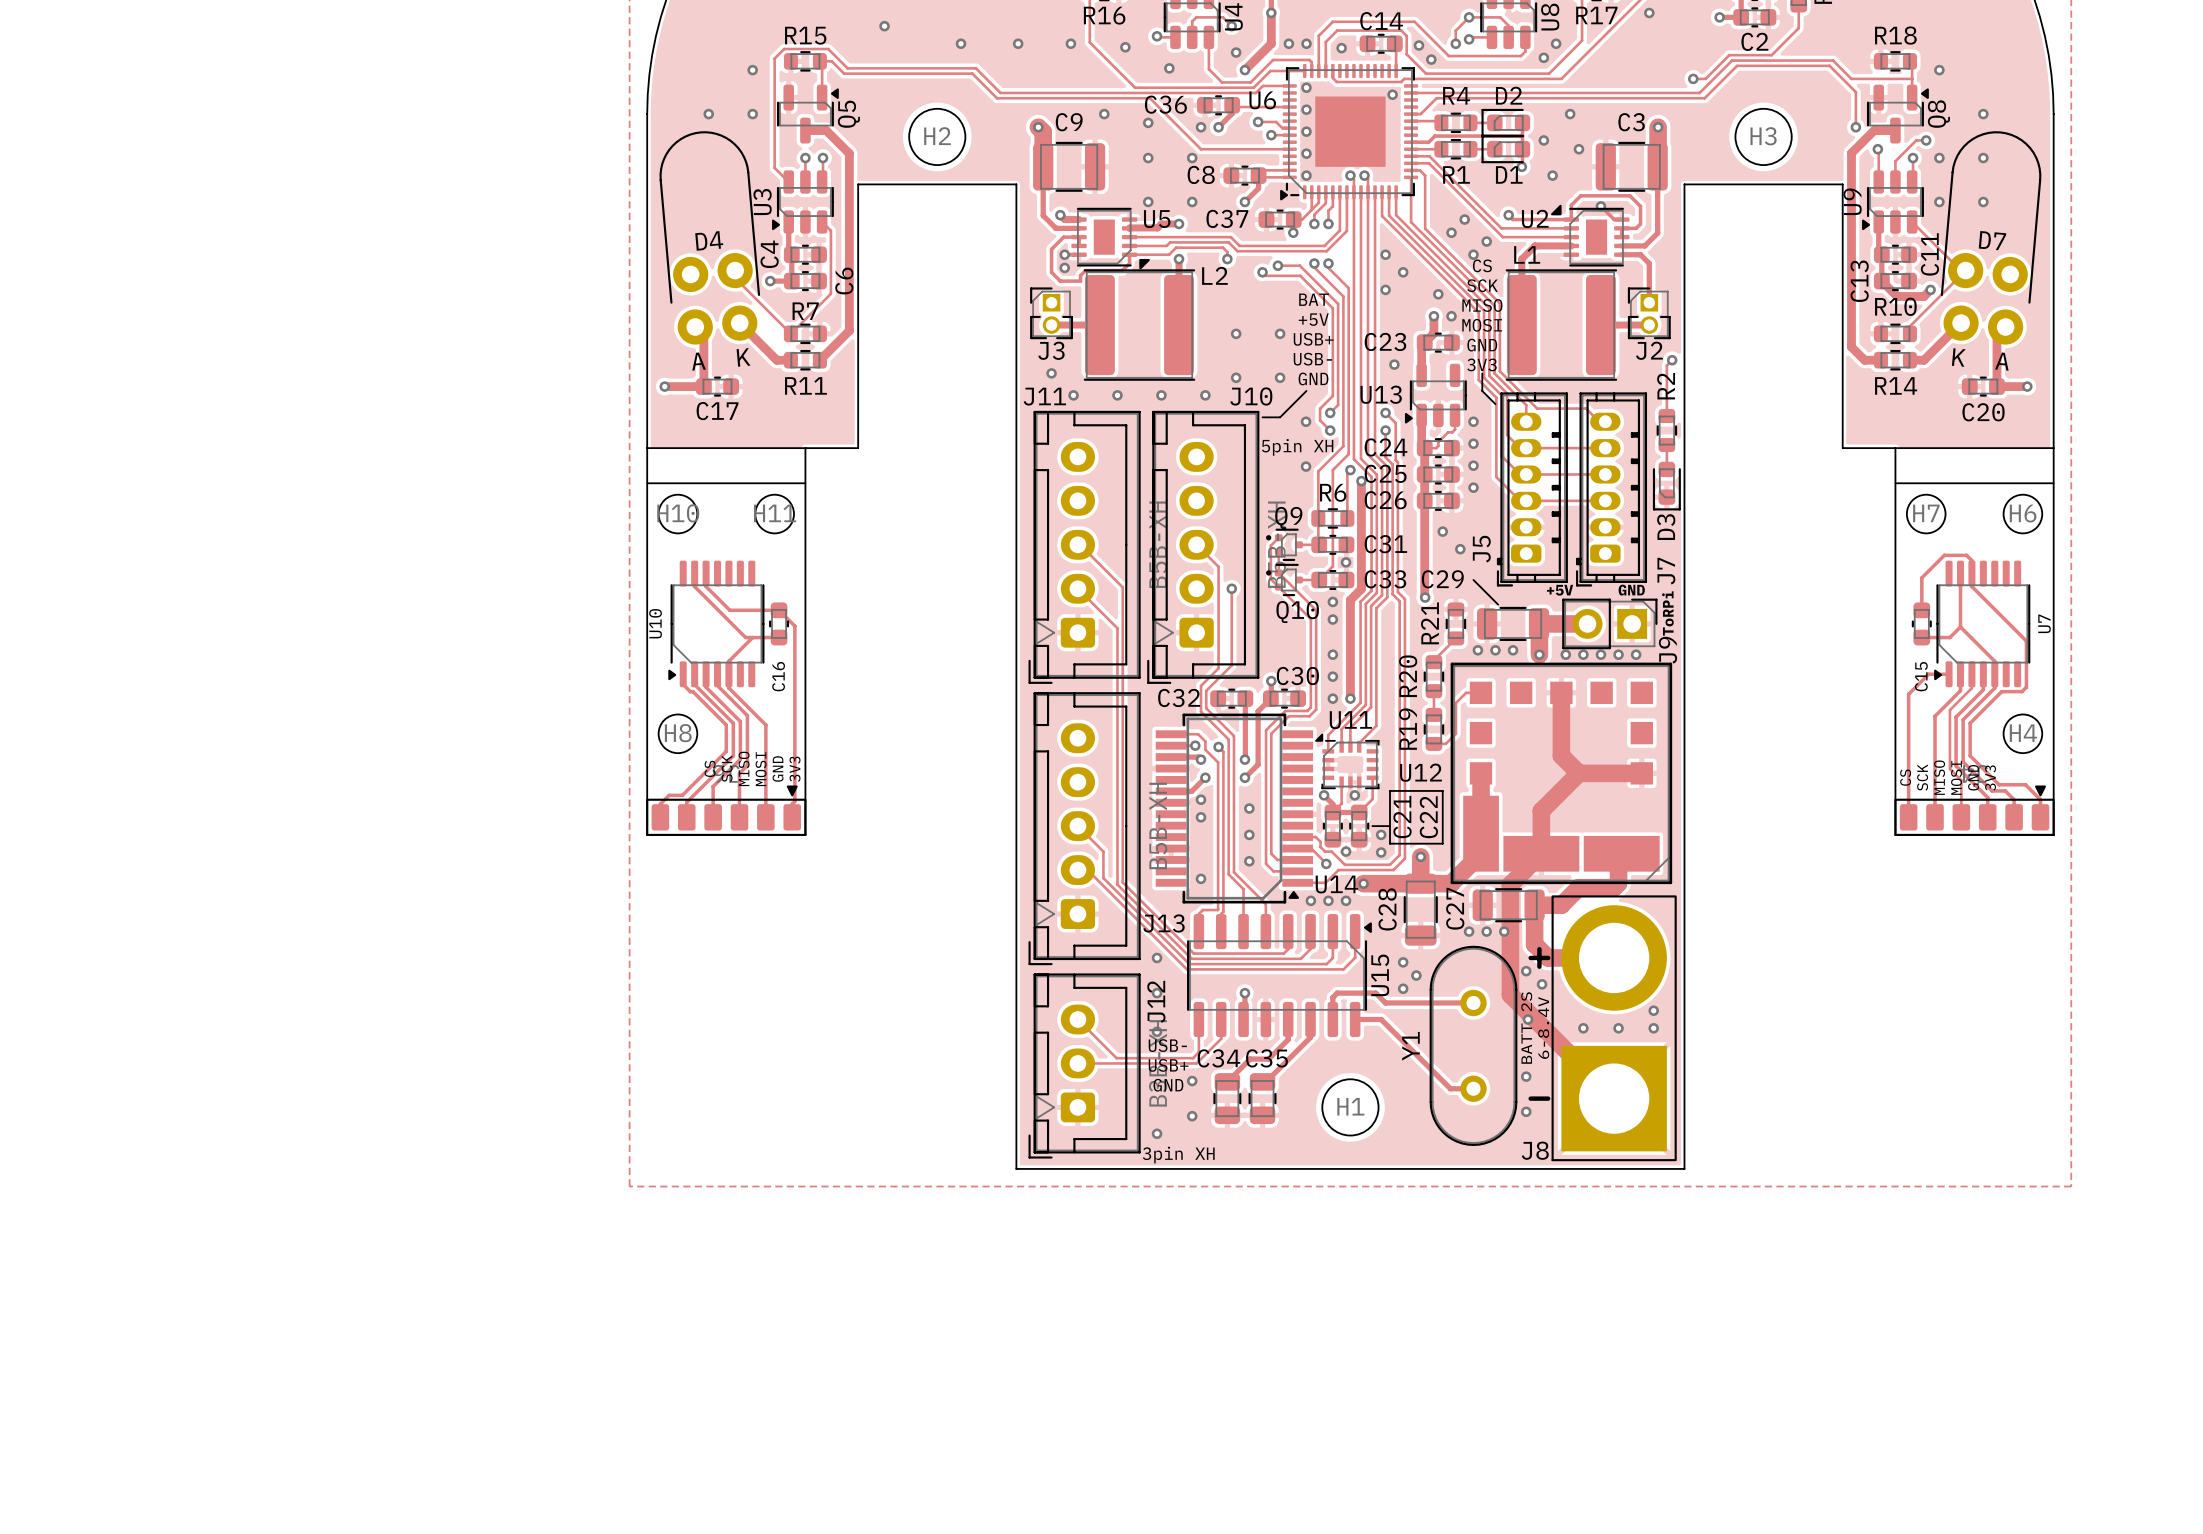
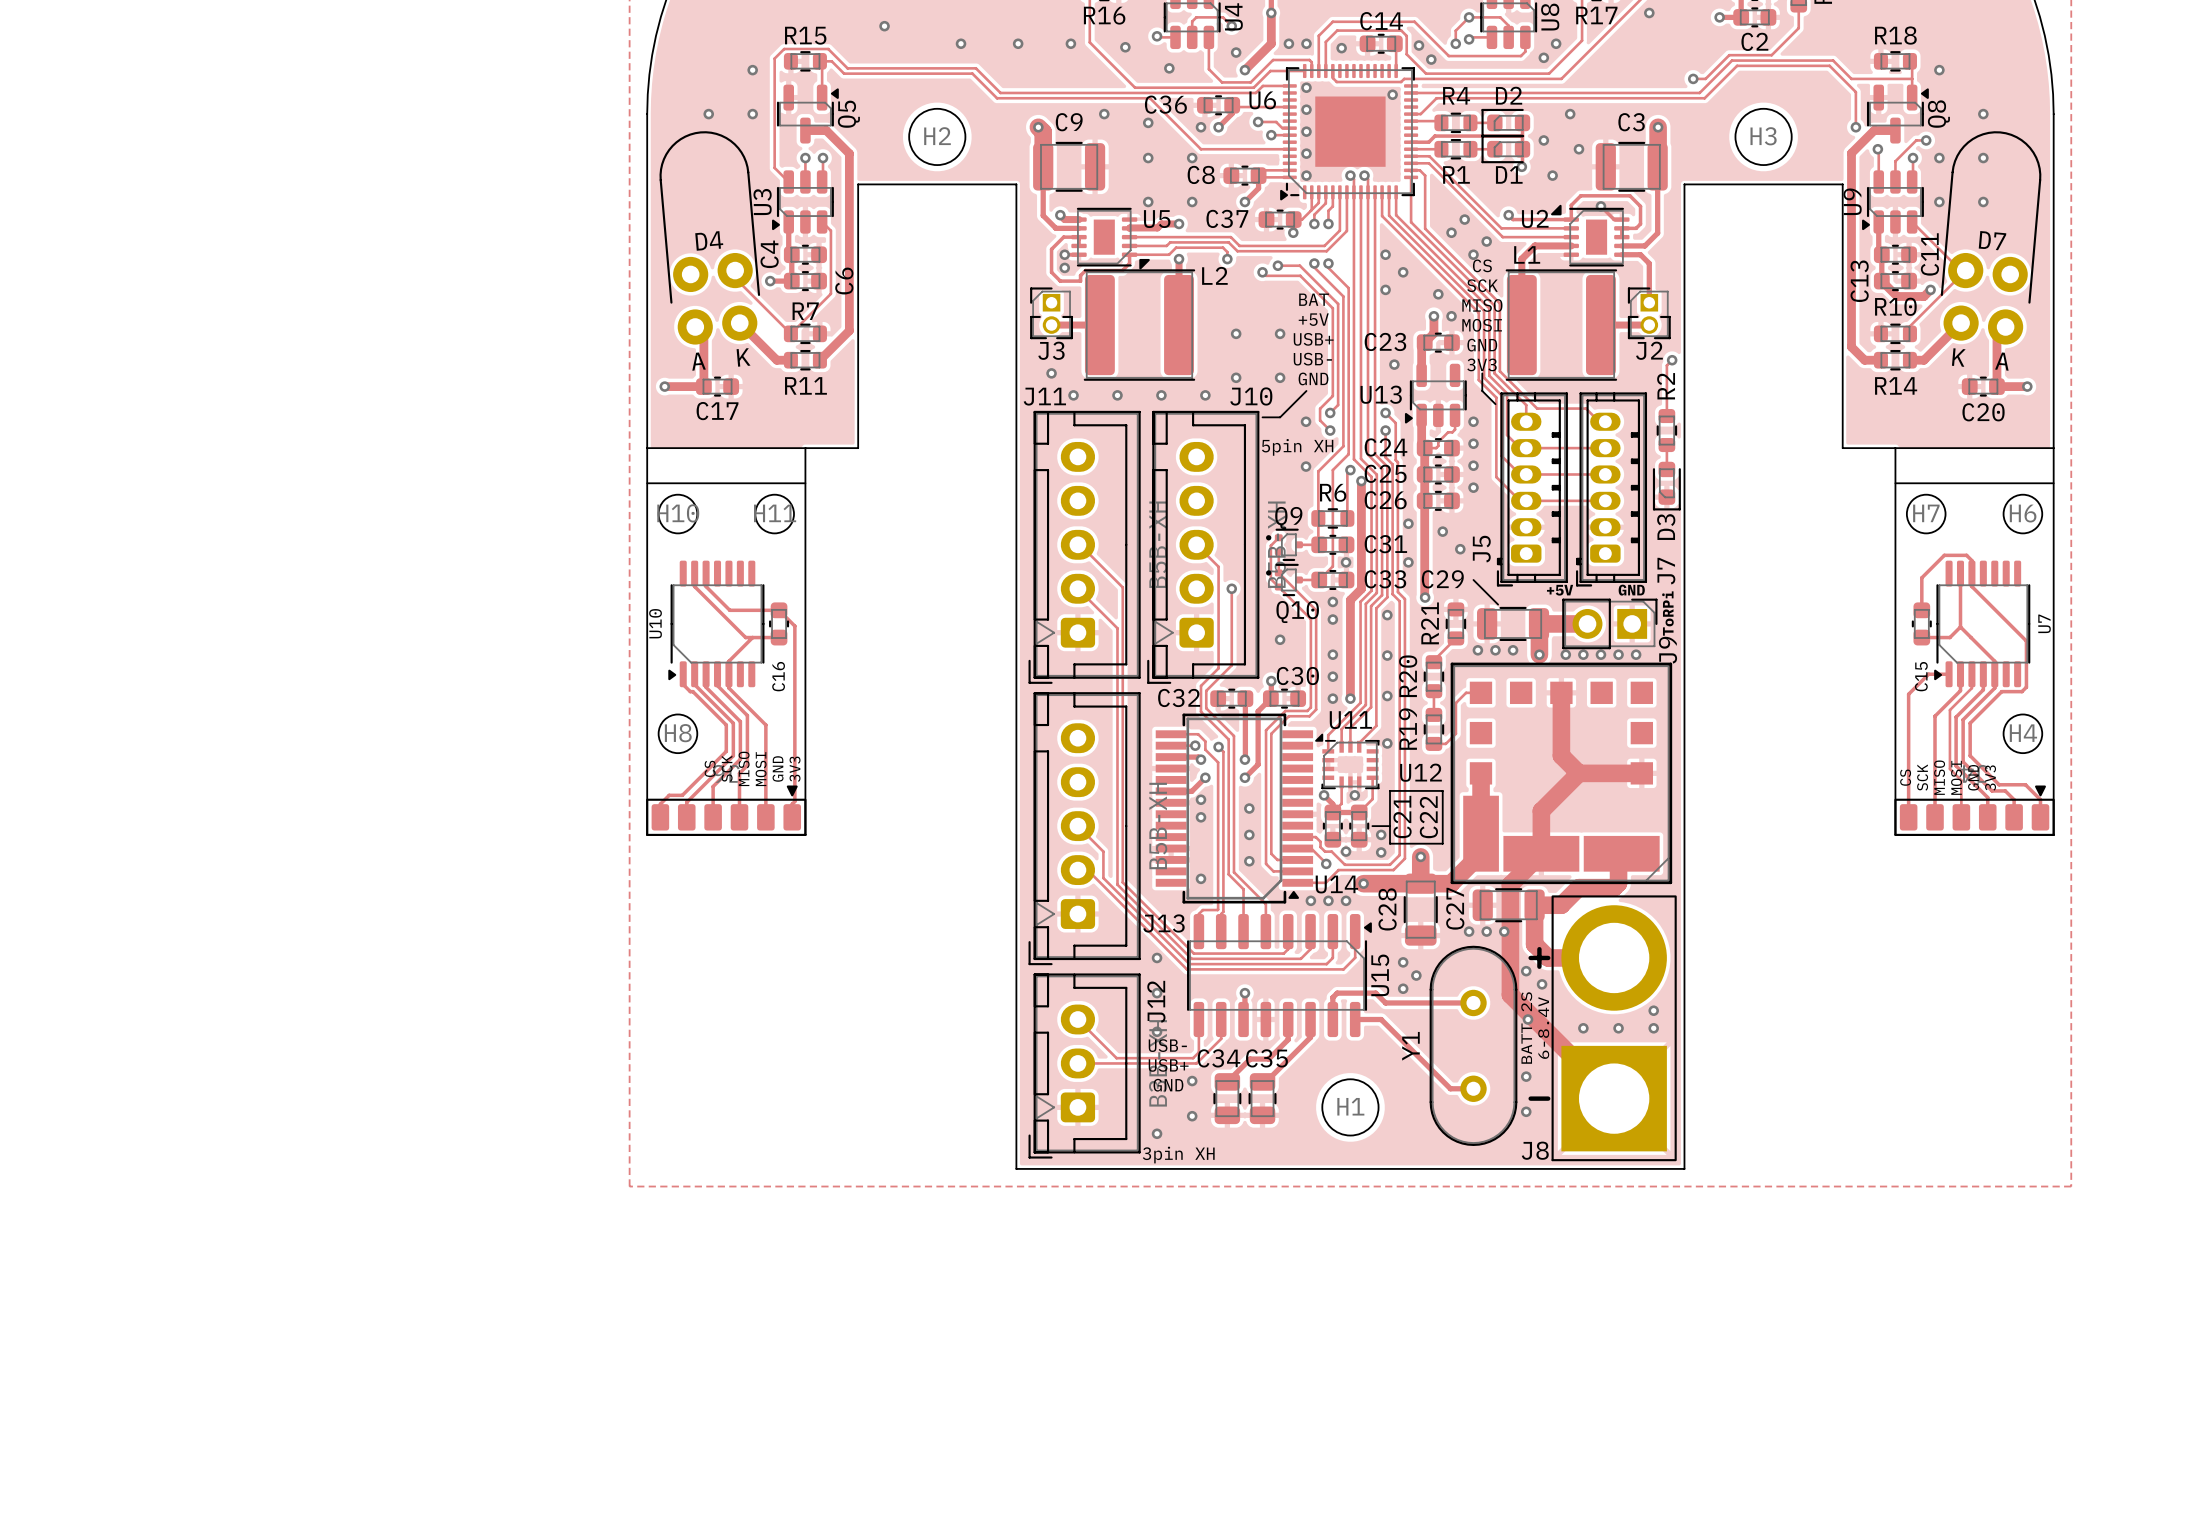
via: none -> (1408, 523)
via: none -> (1408, 562)
via: none -> (1387, 615)
via: none -> (1280, 639)
via: none -> (1387, 655)
via: none -> (1387, 696)
via: none -> (1387, 743)

